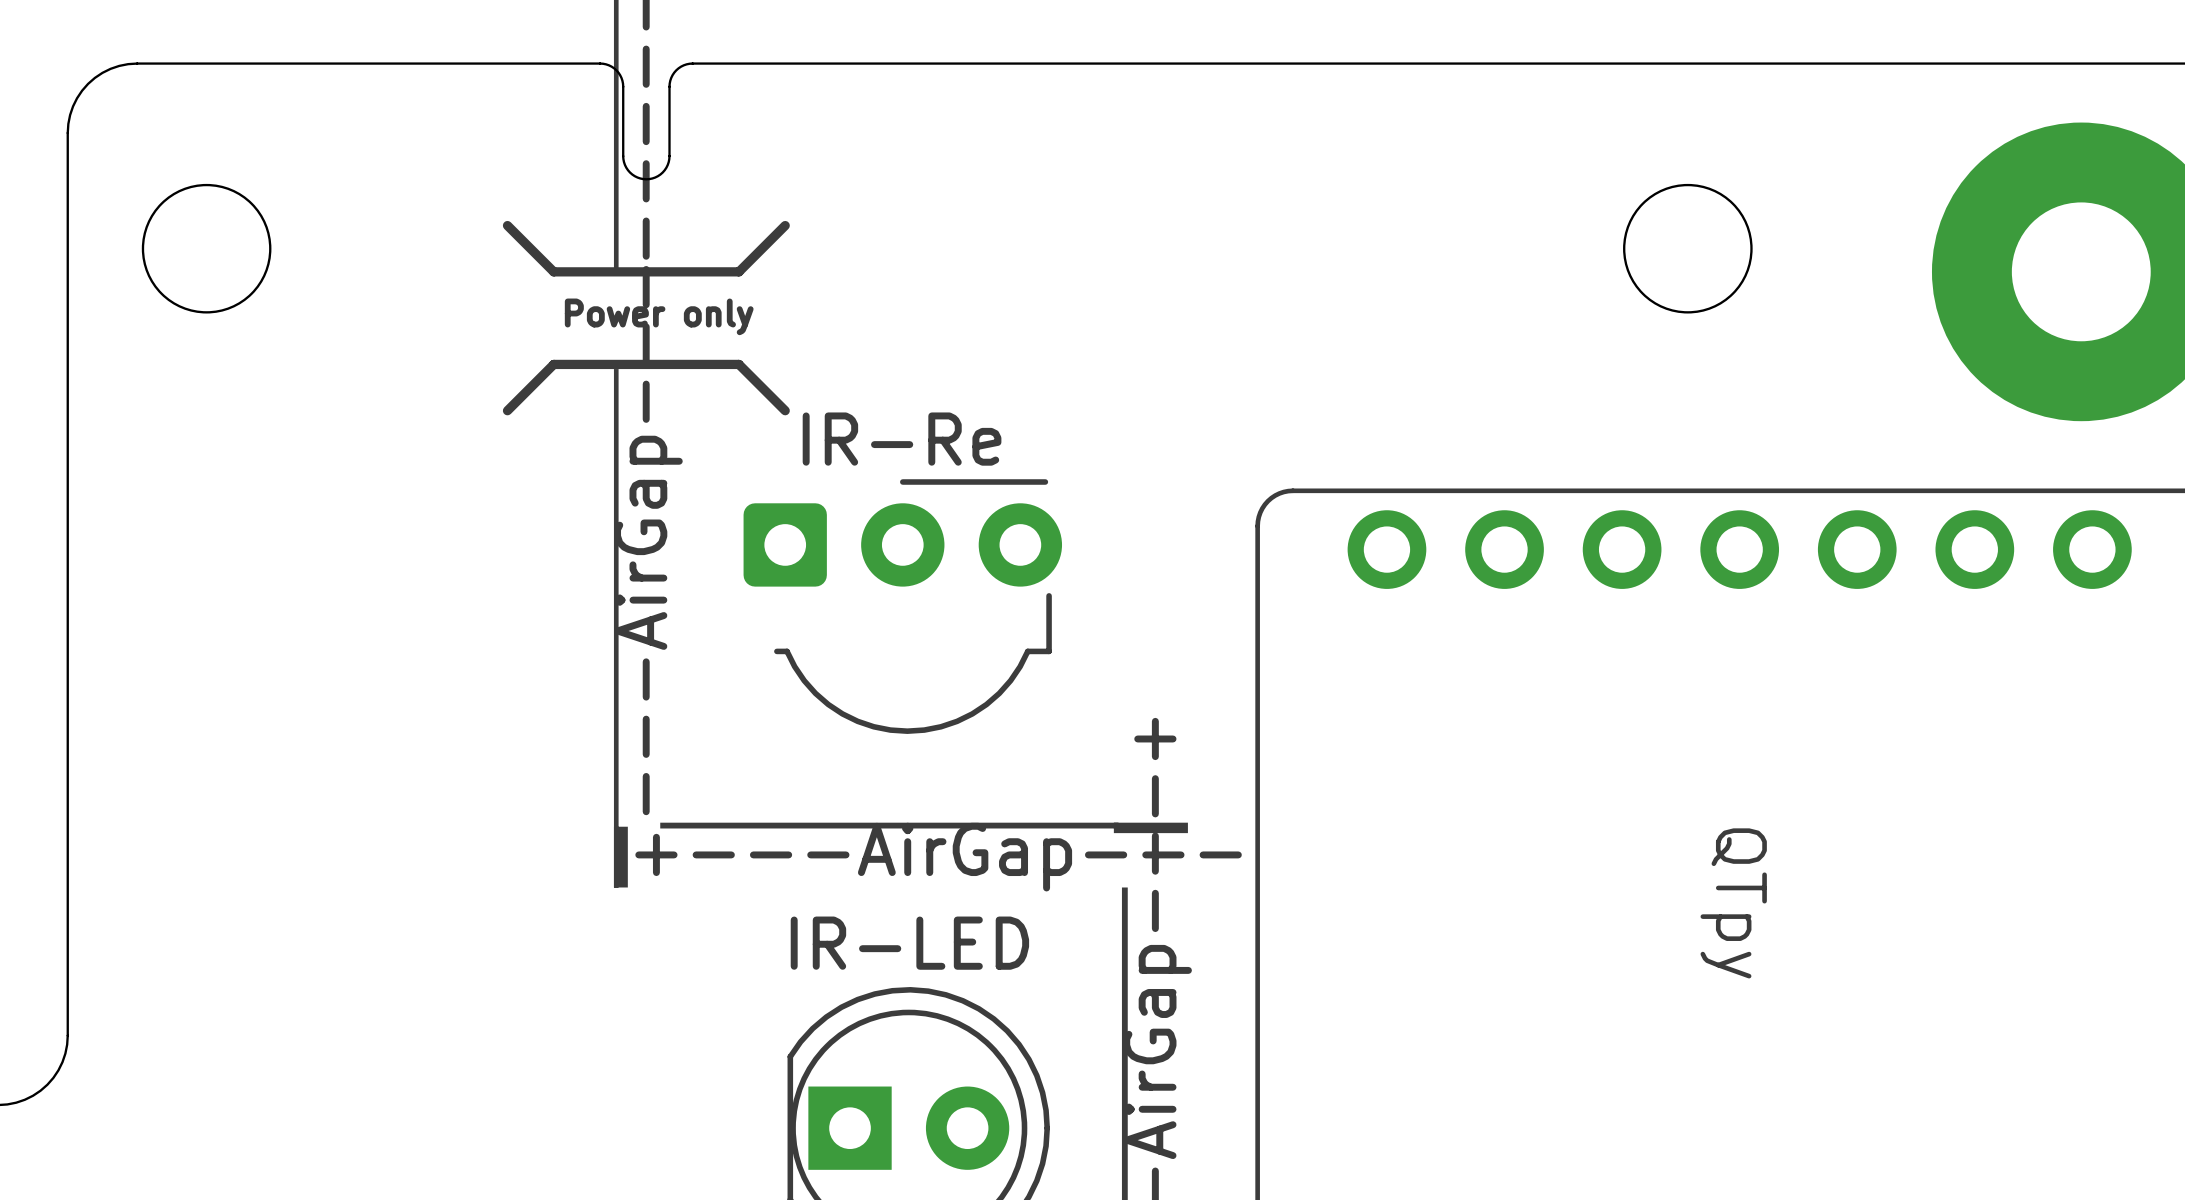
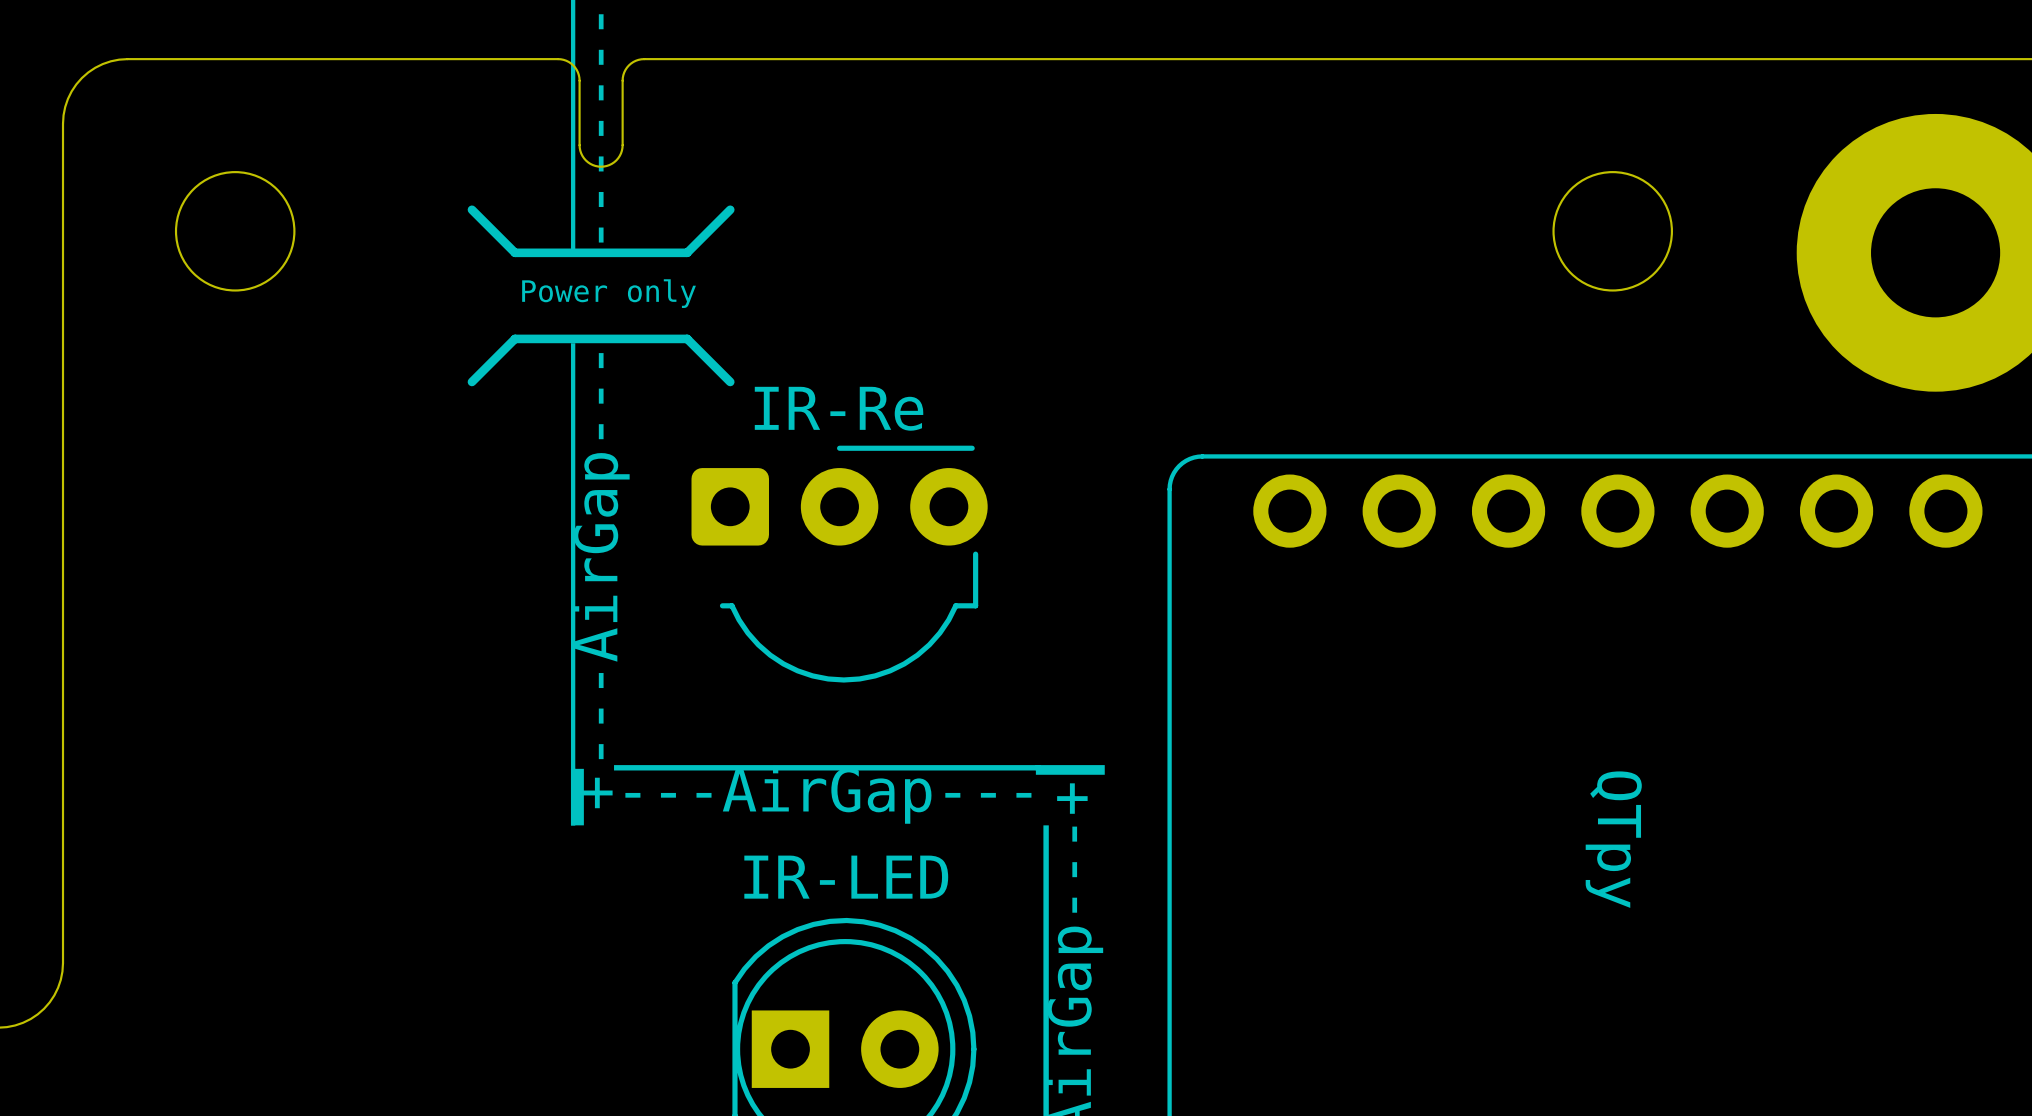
round board edge position: (206, 248) -> (235, 231)
round board edge position: (1687, 248) -> (1612, 231)

